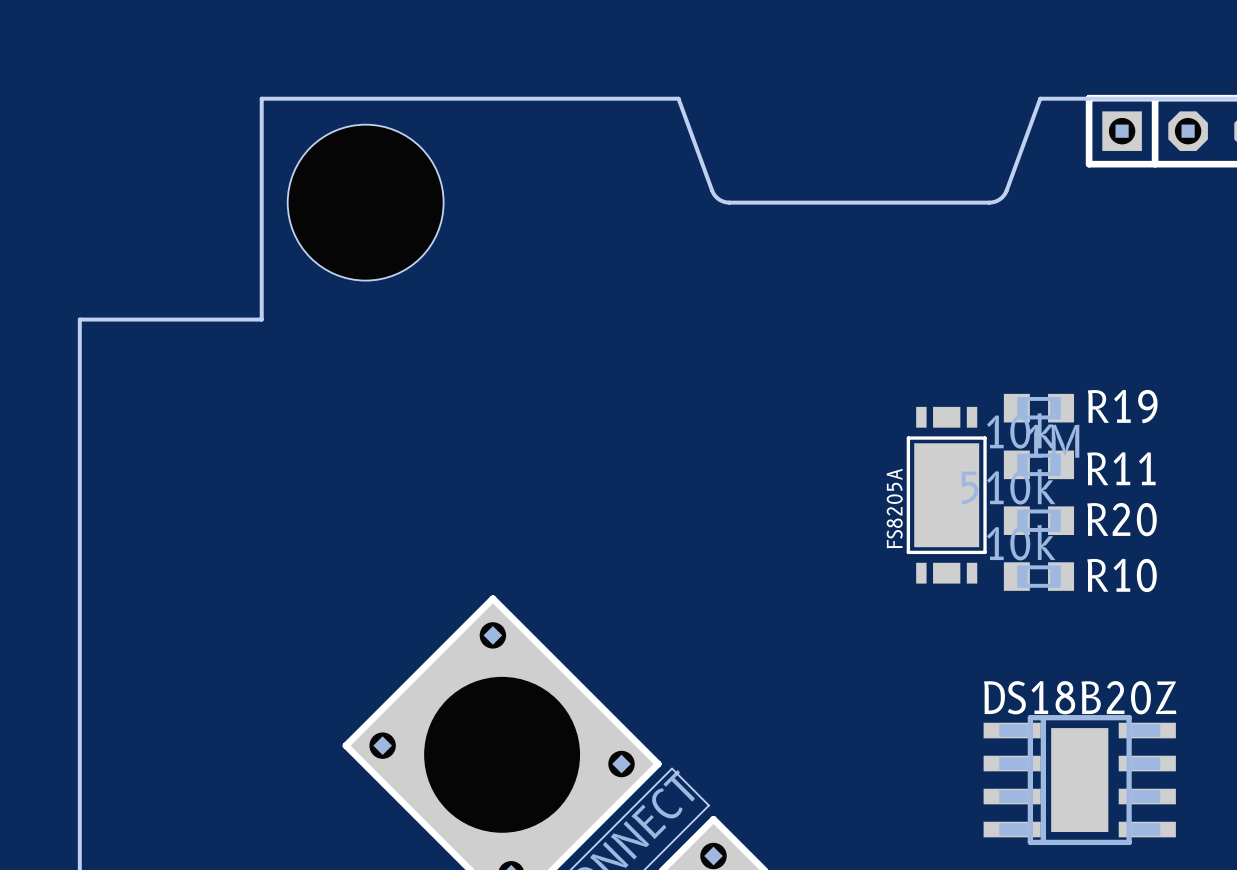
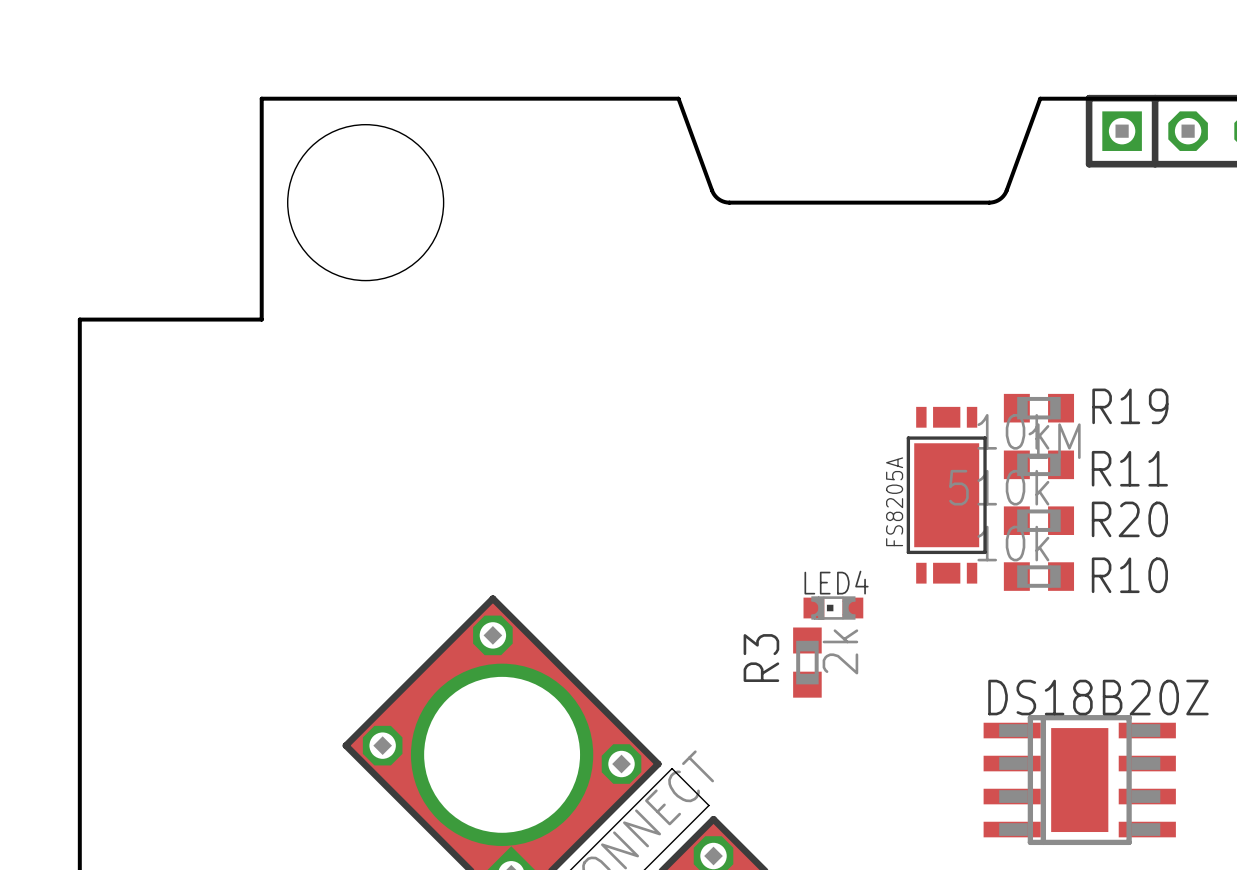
LED4: none -> (833, 608)
R3: none -> 2k (807, 662)

